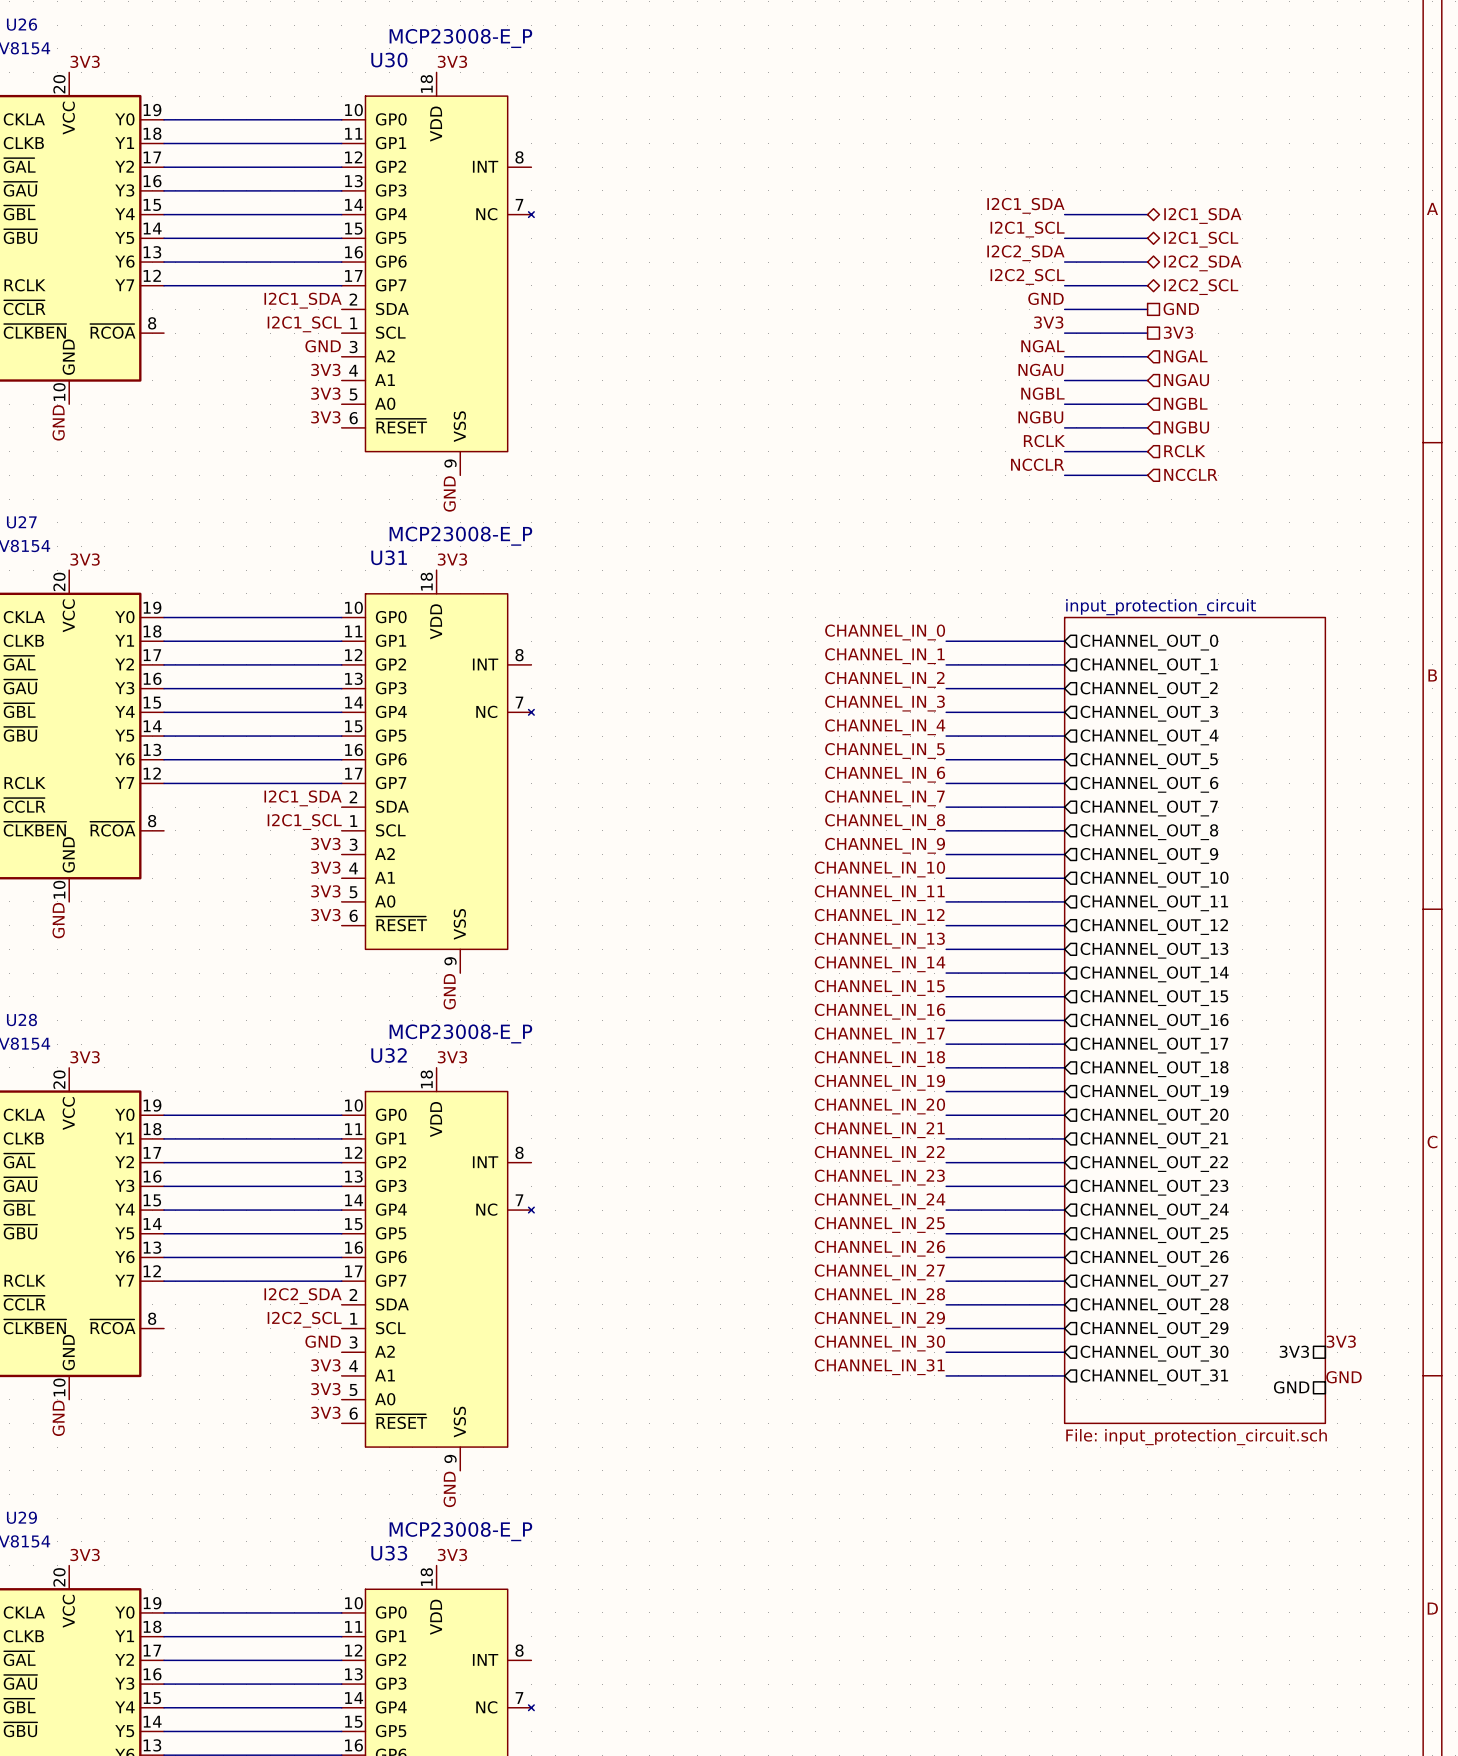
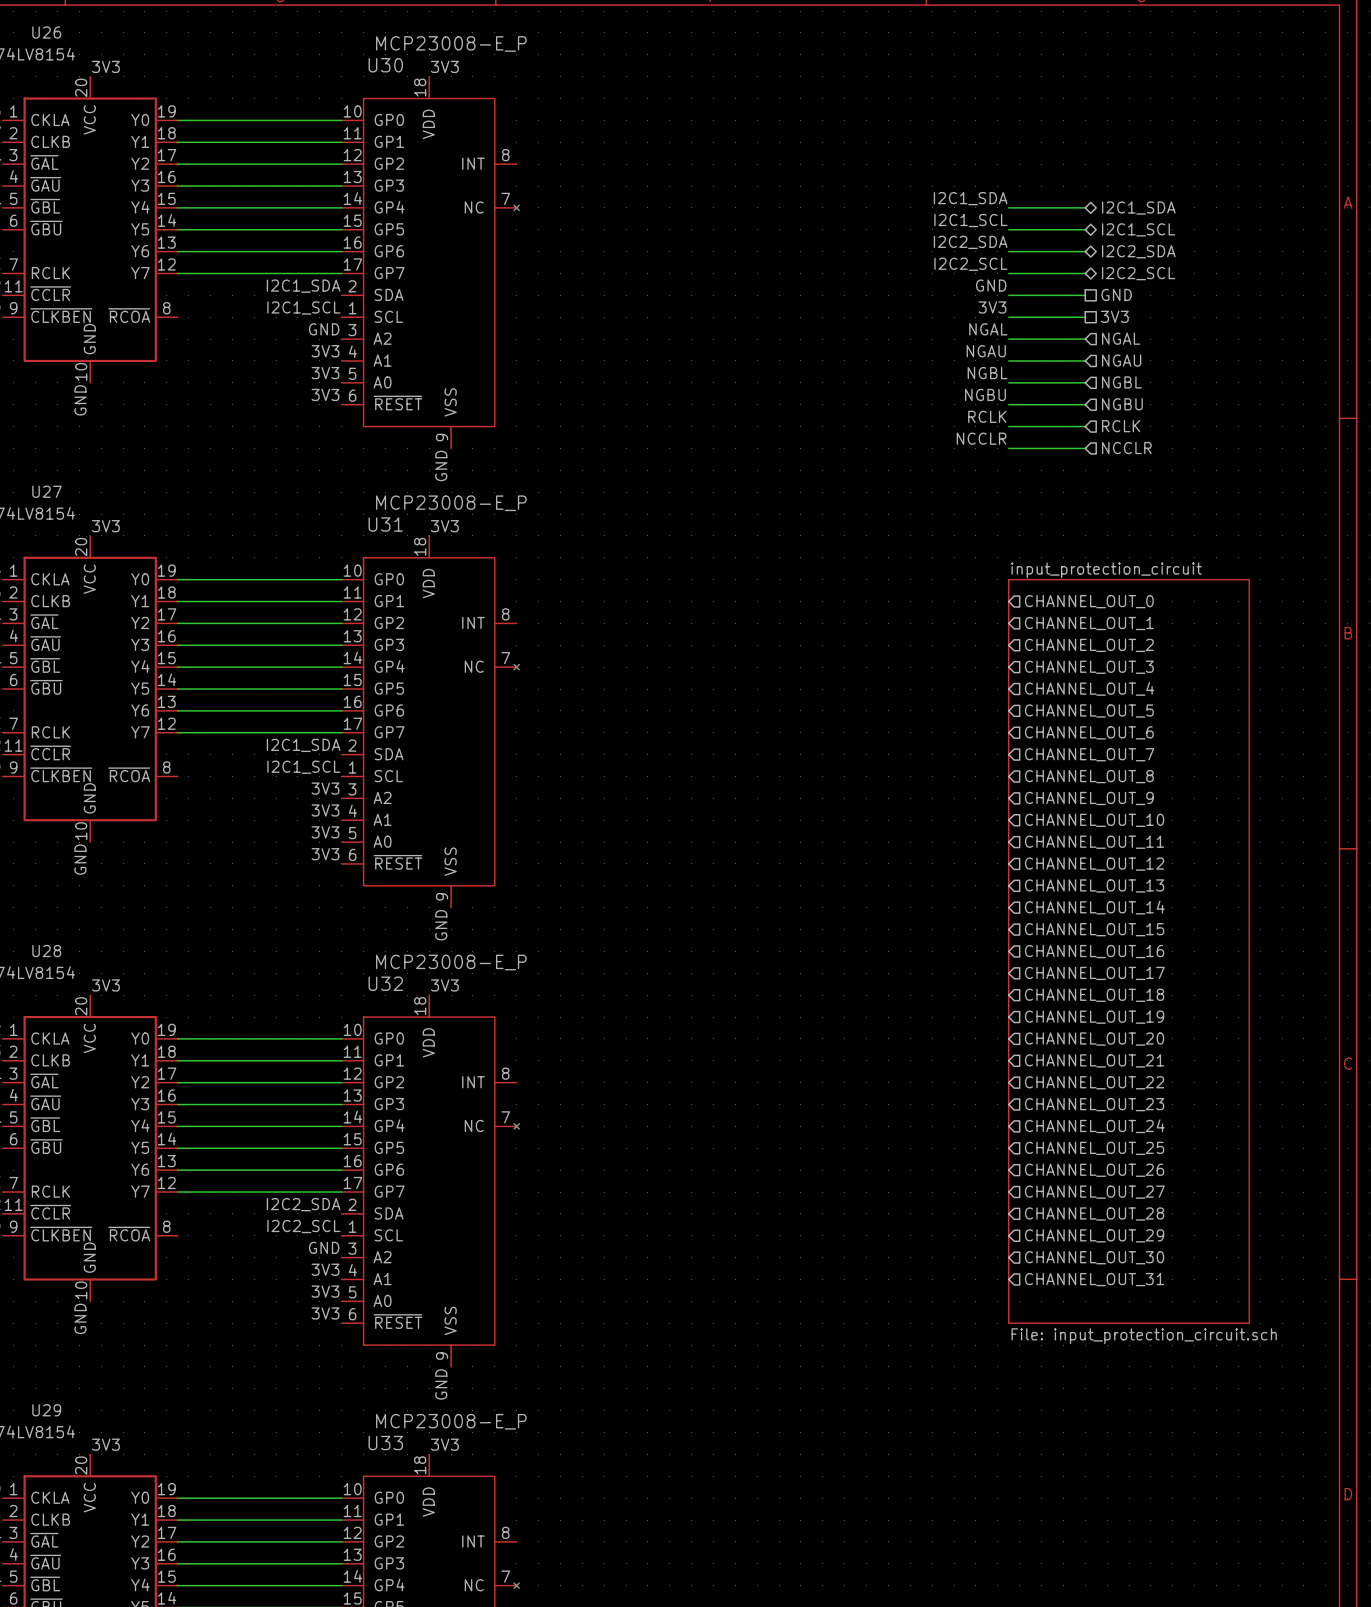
label: CHANNEL_IN_0 (885, 632) -> none
wire: (946, 641) (1064, 641) -> none
label: CHANNEL_IN_1 (884, 656) -> none
wire: (946, 664) (1064, 664) -> none
label: CHANNEL_IN_2 (884, 679) -> none
wire: (946, 688) (1064, 688) -> none
label: CHANNEL_IN_3 (885, 703) -> none
wire: (946, 712) (1064, 712) -> none
label: CHANNEL_IN_4 (885, 727) -> none
wire: (946, 736) (1064, 736) -> none
label: CHANNEL_IN_5 (884, 750) -> none
wire: (946, 759) (1064, 759) -> none
label: CHANNEL_IN_6 (885, 774) -> none
wire: (946, 783) (1064, 783) -> none
label: CHANNEL_IN_7 (884, 798) -> none
wire: (946, 807) (1064, 807) -> none
label: CHANNEL_IN_8 (885, 822) -> none
wire: (946, 830) (1064, 830) -> none
label: CHANNEL_IN_9 (885, 845) -> none
wire: (946, 854) (1064, 854) -> none
label: CHANNEL_IN_10 (879, 869) -> none
wire: (946, 878) (1064, 878) -> none
label: CHANNEL_IN_11 (879, 893) -> none
wire: (946, 901) (1064, 901) -> none
label: CHANNEL_IN_12 (879, 916) -> none
wire: (946, 925) (1064, 925) -> none
label: CHANNEL_IN_13 (879, 940) -> none
wire: (946, 949) (1064, 949) -> none
label: CHANNEL_IN_14 (880, 964) -> none
wire: (946, 973) (1064, 973) -> none
label: CHANNEL_IN_15 (879, 987) -> none
wire: (946, 996) (1064, 996) -> none
label: CHANNEL_IN_16 (879, 1011) -> none
wire: (946, 1020) (1064, 1020) -> none
label: CHANNEL_IN_17 (879, 1035) -> none
wire: (946, 1044) (1064, 1044) -> none
label: CHANNEL_IN_18 (879, 1059) -> none
wire: (946, 1067) (1064, 1067) -> none
label: CHANNEL_IN_19 (879, 1082) -> none
wire: (946, 1091) (1064, 1091) -> none
label: CHANNEL_IN_20 (879, 1106) -> none
wire: (946, 1115) (1064, 1115) -> none
label: CHANNEL_IN_21 (879, 1130) -> none
wire: (946, 1138) (1064, 1138) -> none
label: CHANNEL_IN_22 (879, 1153) -> none
wire: (946, 1162) (1064, 1162) -> none
label: CHANNEL_IN_23 (879, 1177) -> none
wire: (946, 1186) (1064, 1186) -> none
label: CHANNEL_IN_24 (880, 1201) -> none
wire: (946, 1210) (1064, 1210) -> none
label: CHANNEL_IN_25 (879, 1224) -> none
wire: (946, 1233) (1064, 1233) -> none
label: CHANNEL_IN_26 (879, 1248) -> none
wire: (946, 1257) (1064, 1257) -> none
label: CHANNEL_IN_27 (879, 1272) -> none
wire: (946, 1281) (1064, 1281) -> none
label: CHANNEL_IN_28 (879, 1296) -> none
wire: (946, 1304) (1064, 1304) -> none
label: CHANNEL_IN_29 (879, 1319) -> none
wire: (946, 1328) (1064, 1328) -> none
label: 3V3 (1341, 1341) -> none
label: CHANNEL_IN_30 (879, 1343) -> none
sheet pin: 3V3 (1294, 1351) -> none
wire: (946, 1352) (1064, 1352) -> none
label: CHANNEL_IN_31 (879, 1367) -> none
wire: (946, 1375) (1064, 1375) -> none
label: GND (1343, 1377) -> none
sheet pin: GND (1291, 1387) -> none

